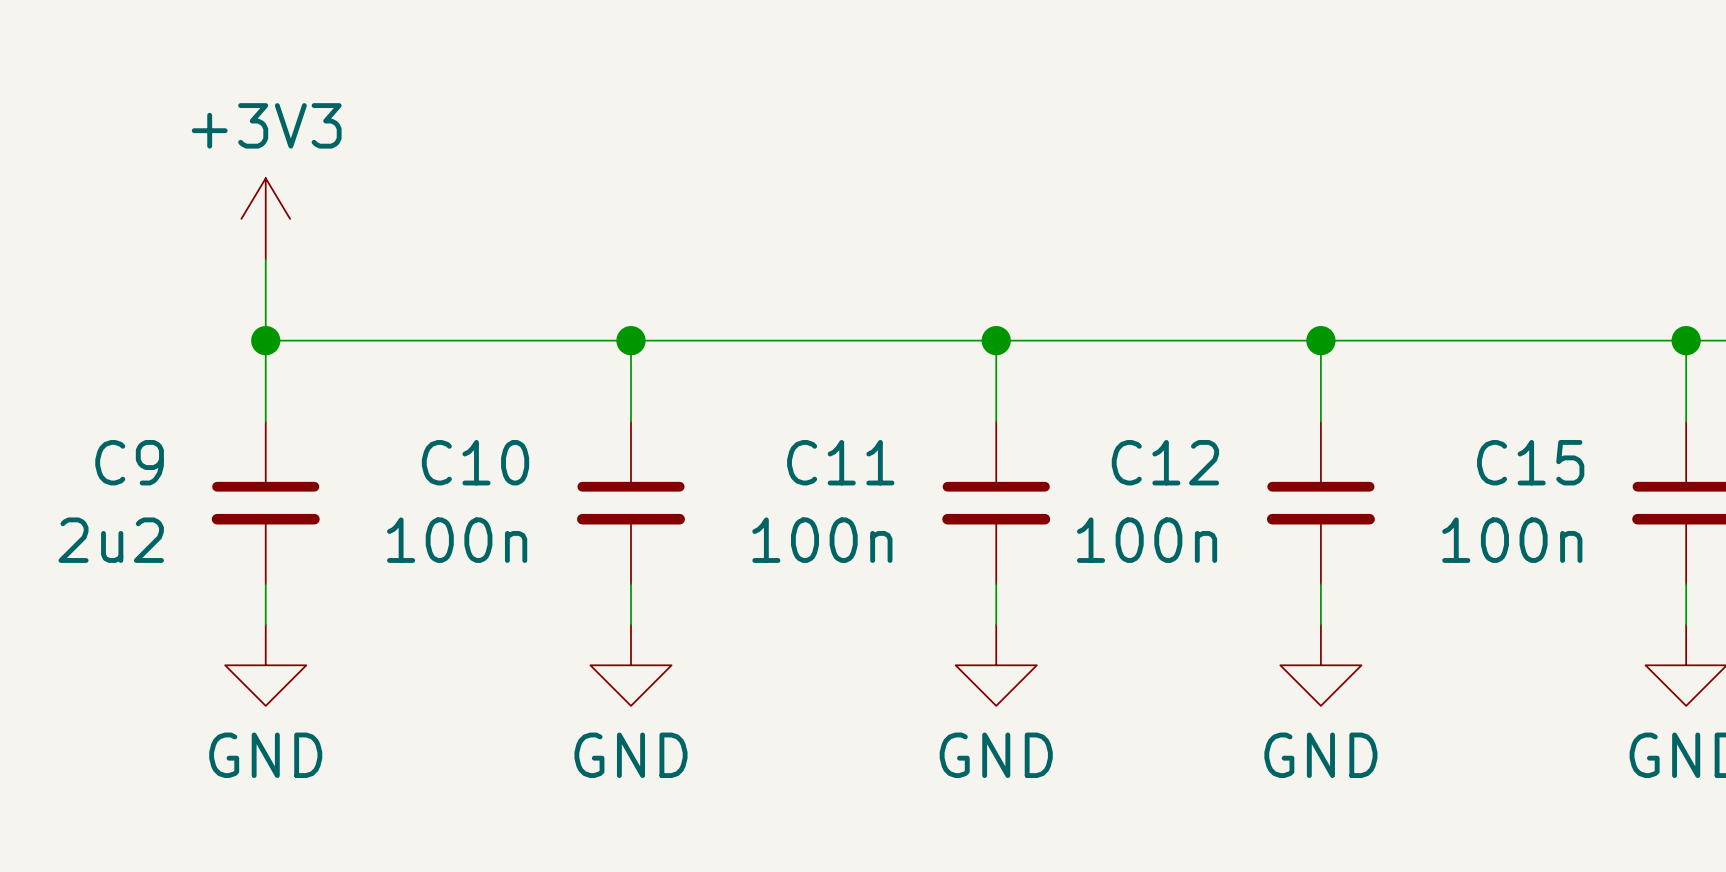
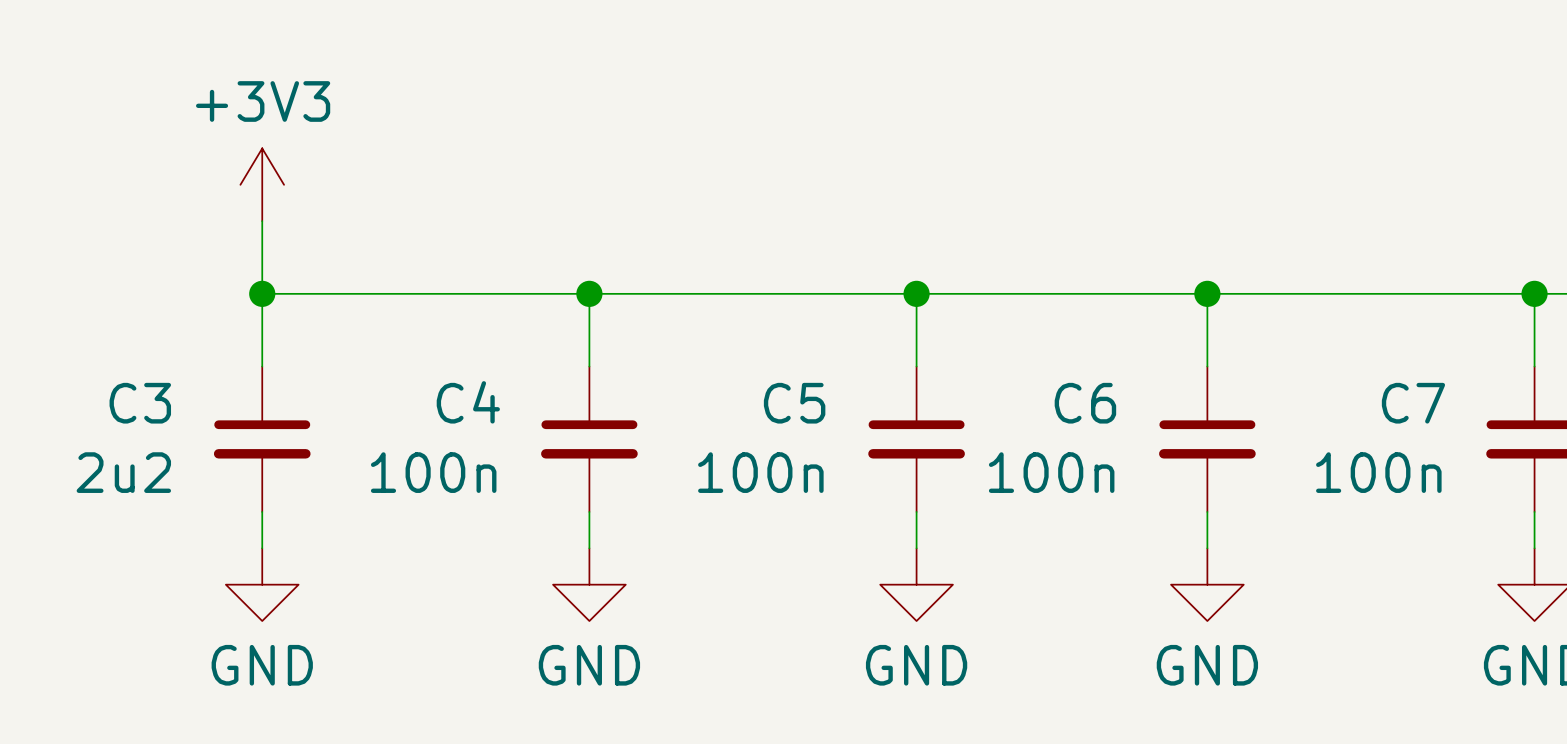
C9 name: C9 (129, 462) -> C3 (140, 403)
C10 name: C10 (475, 462) -> C4 (468, 402)
C11 name: C11 (840, 462) -> C5 (794, 403)
C12 name: C12 (1165, 462) -> C6 (1085, 403)
C15 name: C15 (1530, 462) -> C7 (1413, 403)

